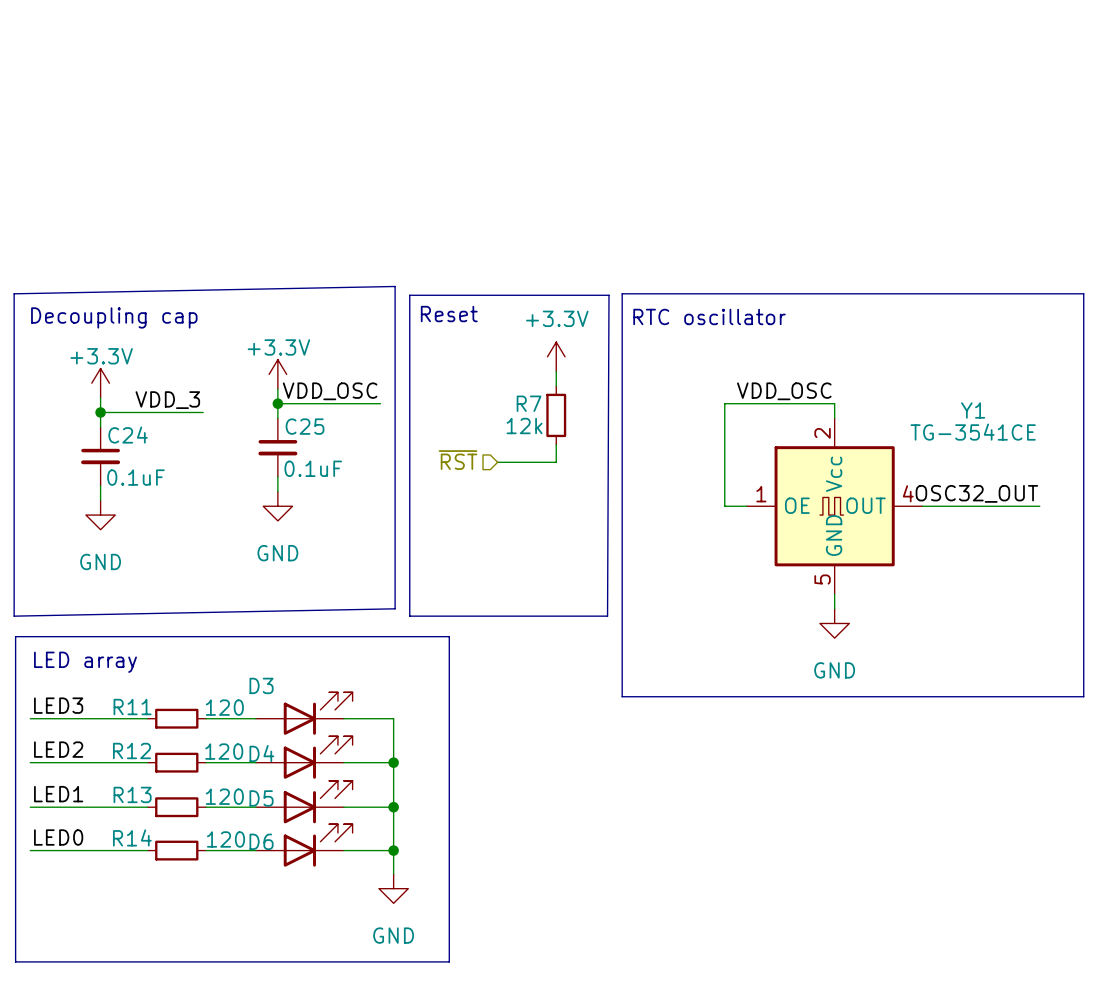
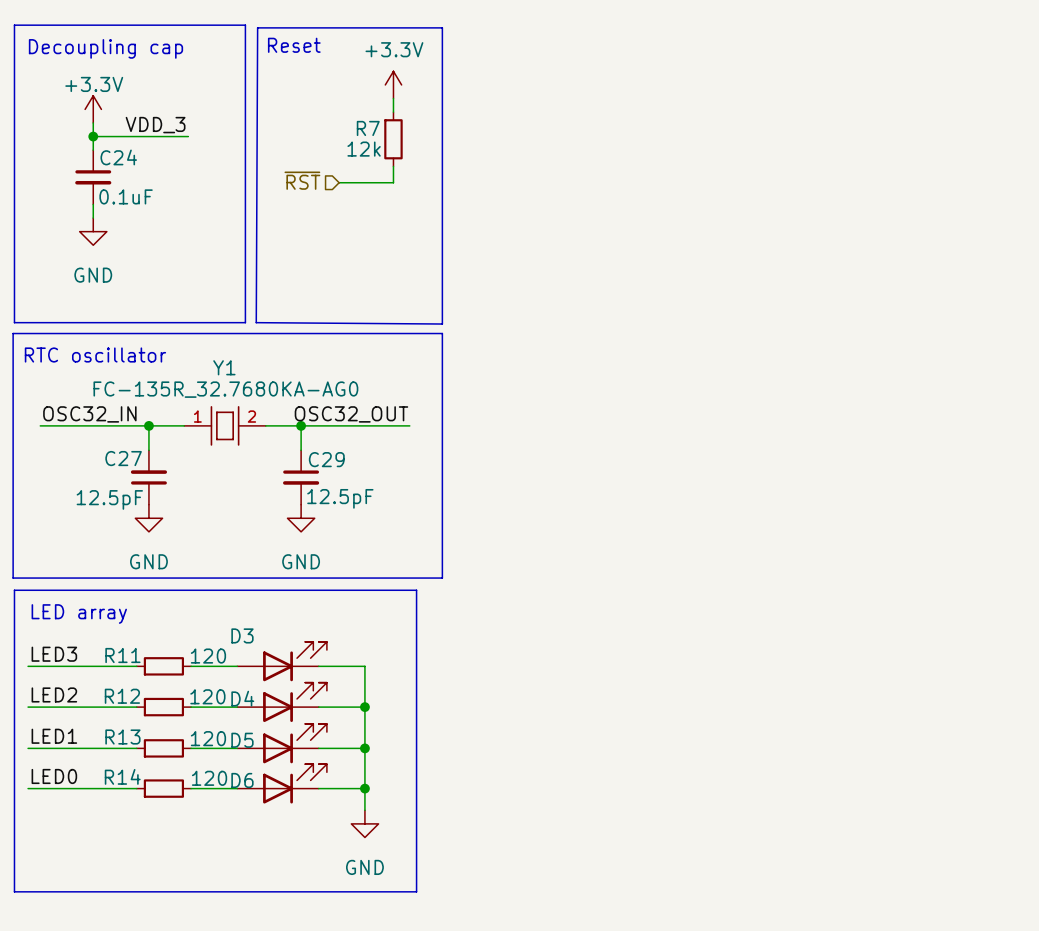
line: none -> (14, 25) (14, 322) (245, 322) (245, 25) (14, 25)
line: none -> (257, 27) (256, 322) (442, 324) (442, 27) (257, 27)
text: none -> Reset (294, 45)
power symbol: none -> +3.3V (393, 84)
wire: none -> (393, 98) (393, 112)
power symbol: none -> +3.3V (93, 109)
junction: none -> (93, 136)
wire: none -> (393, 166) (393, 182) (339, 182)
hierarchical label: none -> ~{RST} (302, 180)
power symbol: none -> GND (93, 231)
line: (622, 293) (622, 696) (1083, 696) (1083, 293) (622, 293) -> none
line: (409, 295) (409, 616) (607, 616) (609, 295) (409, 295) -> none
text: Reset (449, 314) -> none
text: RTC oscillator (709, 316) -> none
text position: Decoupling cap (114, 317) -> Decoupling cap (105, 48)
power symbol: +3.3V (556, 356) -> none
line: (14, 359) (14, 293) (395, 286) (395, 608) (14, 616) -> (13, 333) (442, 333) (442, 578) (13, 578) (13, 571)
wire: (556, 371) (556, 386) -> none
power symbol: +3.3V (277, 374) -> none
text: none -> RTC oscillator (95, 355)
power symbol: +3.3V (100, 383) -> none
wire: (277, 389) (277, 418) -> none
label: VDD_OSC (330, 391) -> none
label: VDD_OSC (784, 391) -> none
wire: (100, 397) (100, 427) -> (93, 122) (93, 150)
label position: VDD_3 (167, 400) -> VDD_3 (155, 125)
wire: (277, 403) (380, 403) -> none
junction: (277, 403) -> none
Y1 name position: Y1 (973, 410) -> Y1 (224, 367)
wire: (100, 412) (203, 412) -> (93, 136) (188, 136)
junction: (100, 412) -> none
R7 position: (556, 415) -> (393, 139)
Y1 symbol: [746, 418, 923, 595] -> [184, 406, 266, 446]
wire: (834, 418) (834, 403) (724, 403) (724, 506) (746, 506) -> none
Y1 value: TG-3541CE (973, 432) -> FC-135R_32.7680KA-AG0 (225, 389)
wire: (556, 444) (556, 462) (497, 462) -> none
label: none -> OSC32_IN (89, 414)
C25: 0.1uF (277, 447) -> none
label: none -> OSC32_OUT (351, 414)
C24 position: (100, 456) -> (93, 177)
wire: none -> (40, 425) (184, 425)
wire: none -> (148, 425) (148, 450)
junction: none -> (148, 425)
wire: none -> (265, 425) (409, 425)
wire: none -> (301, 425) (301, 450)
junction: none -> (301, 425)
hierarchical label: ~{RST} (458, 460) -> none
wire: (277, 476) (277, 491) -> none
wire: (100, 485) (100, 500) -> (93, 204) (93, 218)
label: OSC32_OUT (976, 493) -> none
power symbol: GND (277, 506) -> none
wire: (922, 506) (1039, 506) -> none
power symbol: GND (100, 515) -> none
C27: none -> 12.5pF (148, 477)
C29: none -> 12.5pF (301, 477)
power symbol: none -> GND (148, 518)
power symbol: none -> GND (301, 518)
wire: (834, 594) (834, 608) -> none
power symbol: GND (834, 623) -> none

